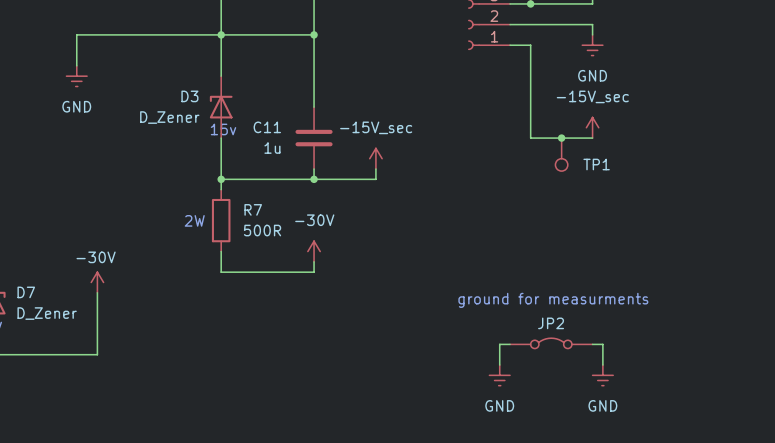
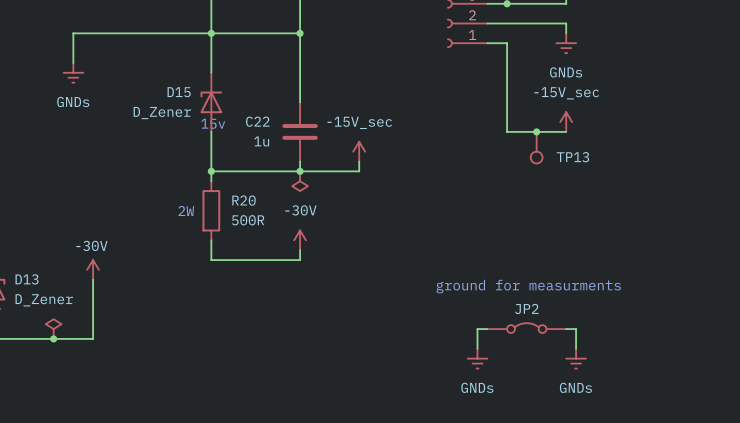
power symbol: GND (592, 45) -> GNDs (566, 43)
power symbol: GND (76, 76) -> GNDs (73, 72)
D3 name: D3 (189, 96) -> D15 (179, 92)
C11 name: C11 (267, 127) -> C22 (257, 121)
TP1 name: TP1 (596, 164) -> TP13 (572, 157)
power symbol: none -> (300, 181)
R7 name: R7 (253, 209) -> R20 (244, 200)
D7 name: D7 (26, 292) -> D13 (27, 279)
power symbol: none -> (53, 329)
junction: none -> (53, 338)
power symbol: GND (499, 375) -> GNDs (477, 358)
power symbol: GND (602, 375) -> GNDs (576, 358)

